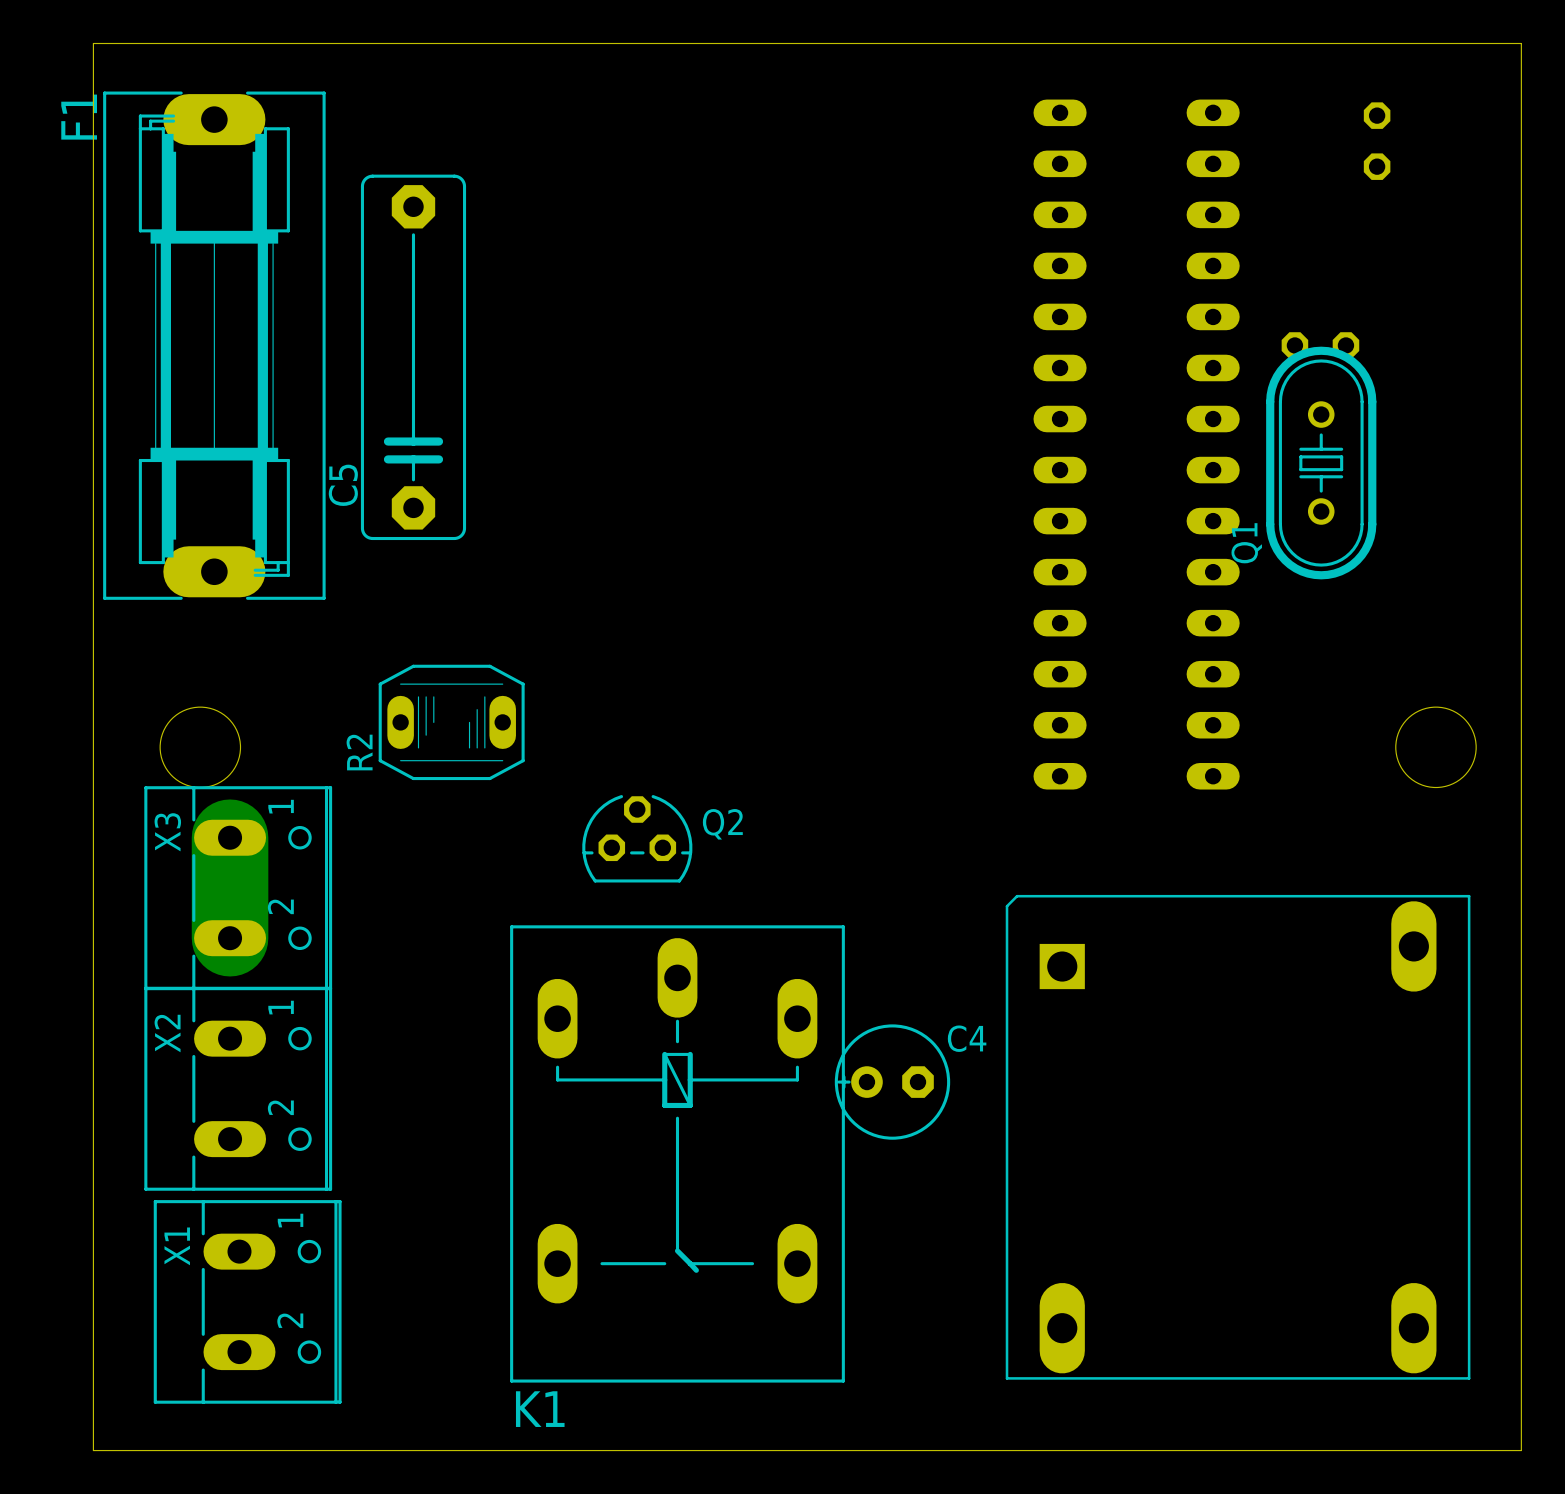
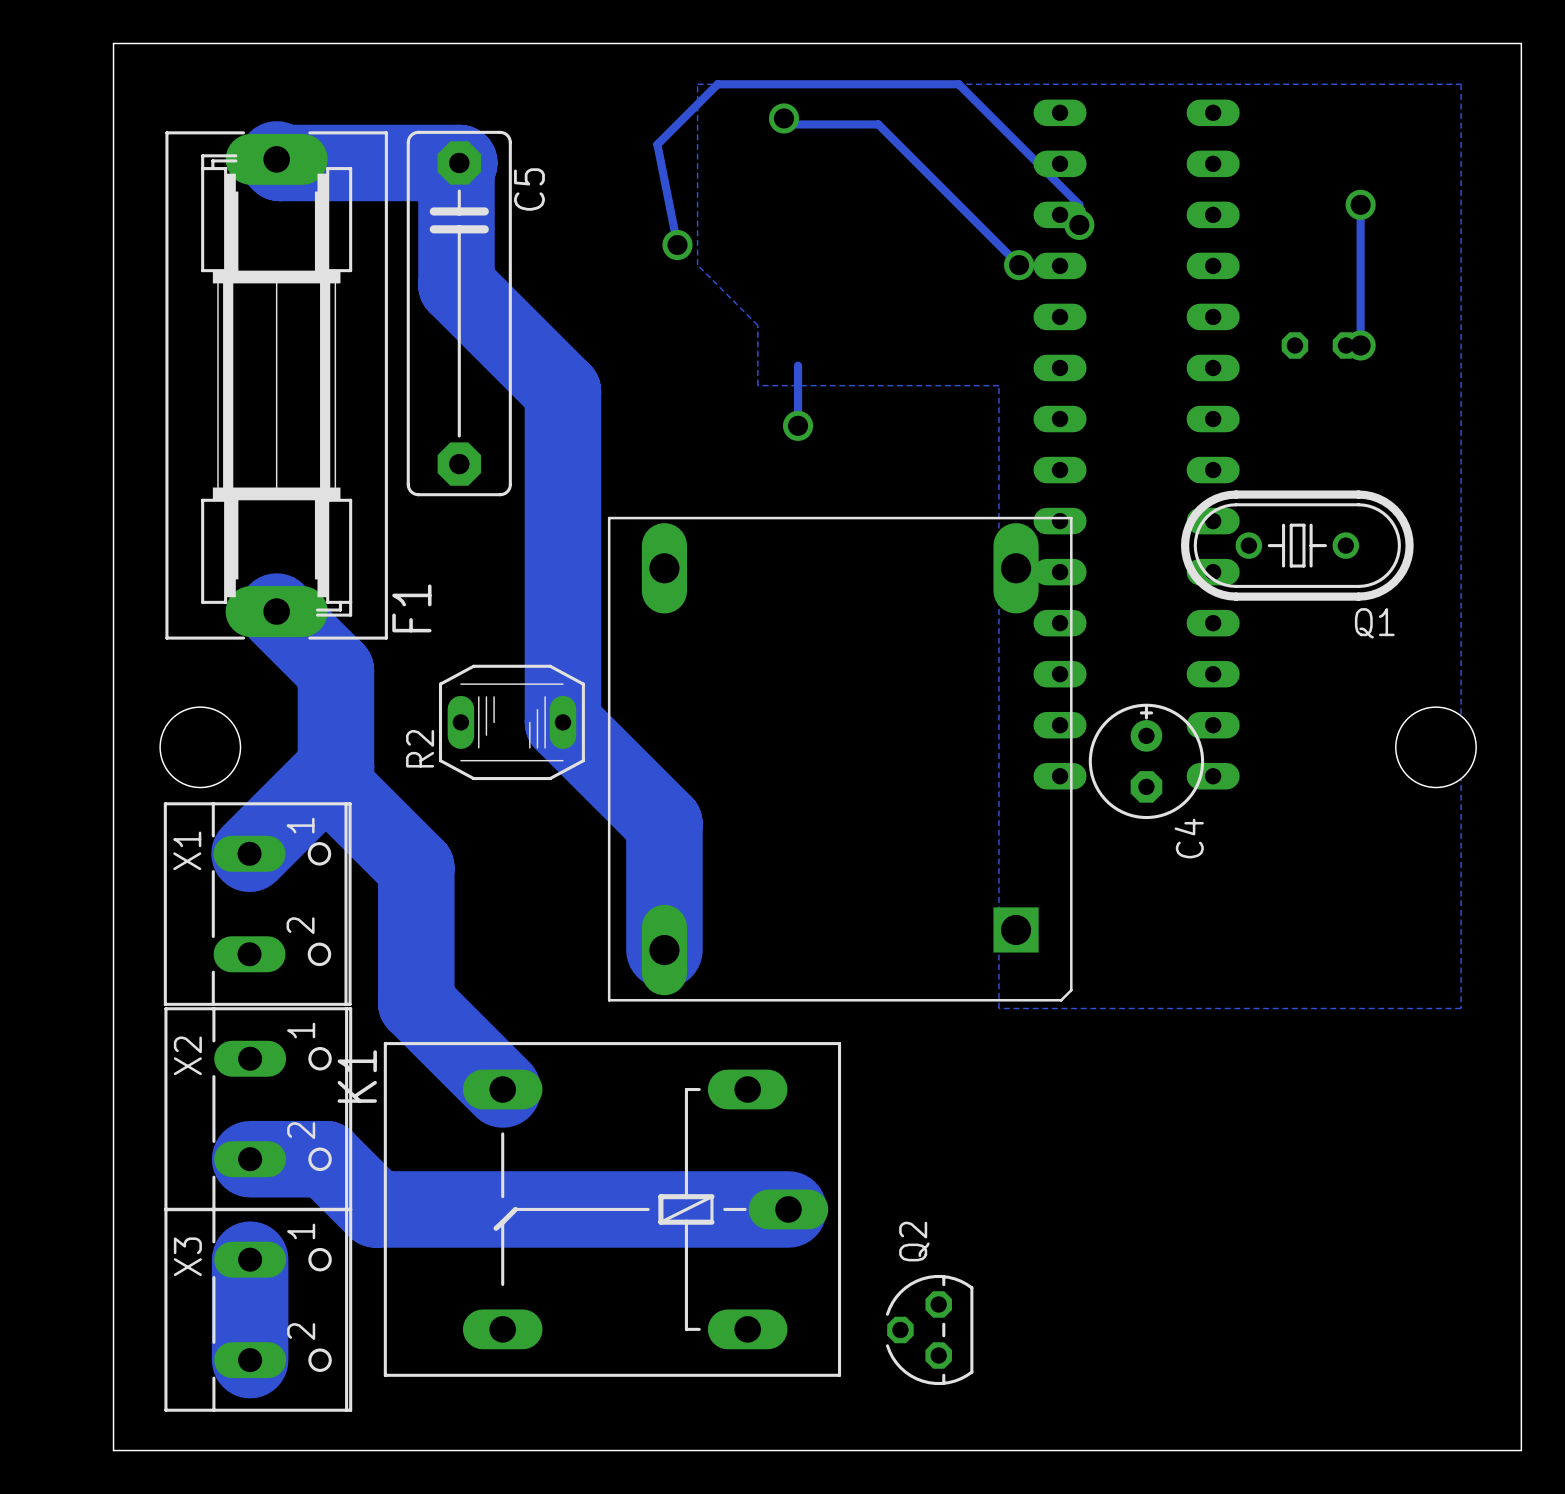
board edge: (113, 43) (93, 43) (93, 1450) (113, 1450) -> (113, 43) (113, 1450)
zone outline: none -> (1461, 84) (1461, 1008) (998, 1008) (998, 385) (757, 385) (757, 325) (697, 265) (697, 84) (1461, 84)
F1 name position: F1 (79, 117) -> F1 (411, 608)
track: none -> (783, 118) (790, 124) (878, 124) (1019, 265)
via: none -> (783, 118)
part: (1377, 141) -> none
track: none -> (276, 159) (280, 162) (459, 162) (456, 165) (456, 285) (562, 391) (562, 722) (664, 823) (664, 950)
track: none -> (1360, 204) (1360, 345)
via: none -> (1360, 204)
track: none -> (1079, 224) (1079, 204) (958, 84) (717, 84) (657, 144) (677, 245)
via: none -> (1079, 224)
via: none -> (677, 245)
via: none -> (1019, 265)
F1 position: (214, 345) -> (276, 385)
via: none -> (1360, 345)
C5 rotation: 0° (413, 357) -> 180° (459, 313)
track: none -> (798, 365) (798, 425)
via: none -> (798, 425)
Q1 rotation: 0° (1321, 463) -> 90° counterclockwise (1297, 545)
track: none -> (276, 611) (335, 670) (335, 787) (416, 867) (416, 1003) (502, 1089)
R2 position: (451, 722) -> (511, 722)
part: none -> (840, 759)
track: none -> (335, 767) (249, 853)
track: (230, 837) (230, 938) -> (250, 1259) (250, 1360)
Q2 rotation: 0° (637, 838) -> 90° counterclockwise (929, 1329)
Q2 position: (637, 838) -> (929, 1329)
X3 position: (238, 888) -> (258, 1309)
C4 rotation: 0° (892, 1082) -> 90° clockwise (1146, 761)
C4 position: (892, 1082) -> (1146, 761)
X2 position: (238, 1088) -> (258, 1109)
part: (1238, 1137) -> none
K1 rotation: 0° (677, 1153) -> 90° clockwise (612, 1209)
track: none -> (250, 1159) (325, 1159) (376, 1209) (788, 1209)
X1 position: (247, 1301) -> (257, 904)

